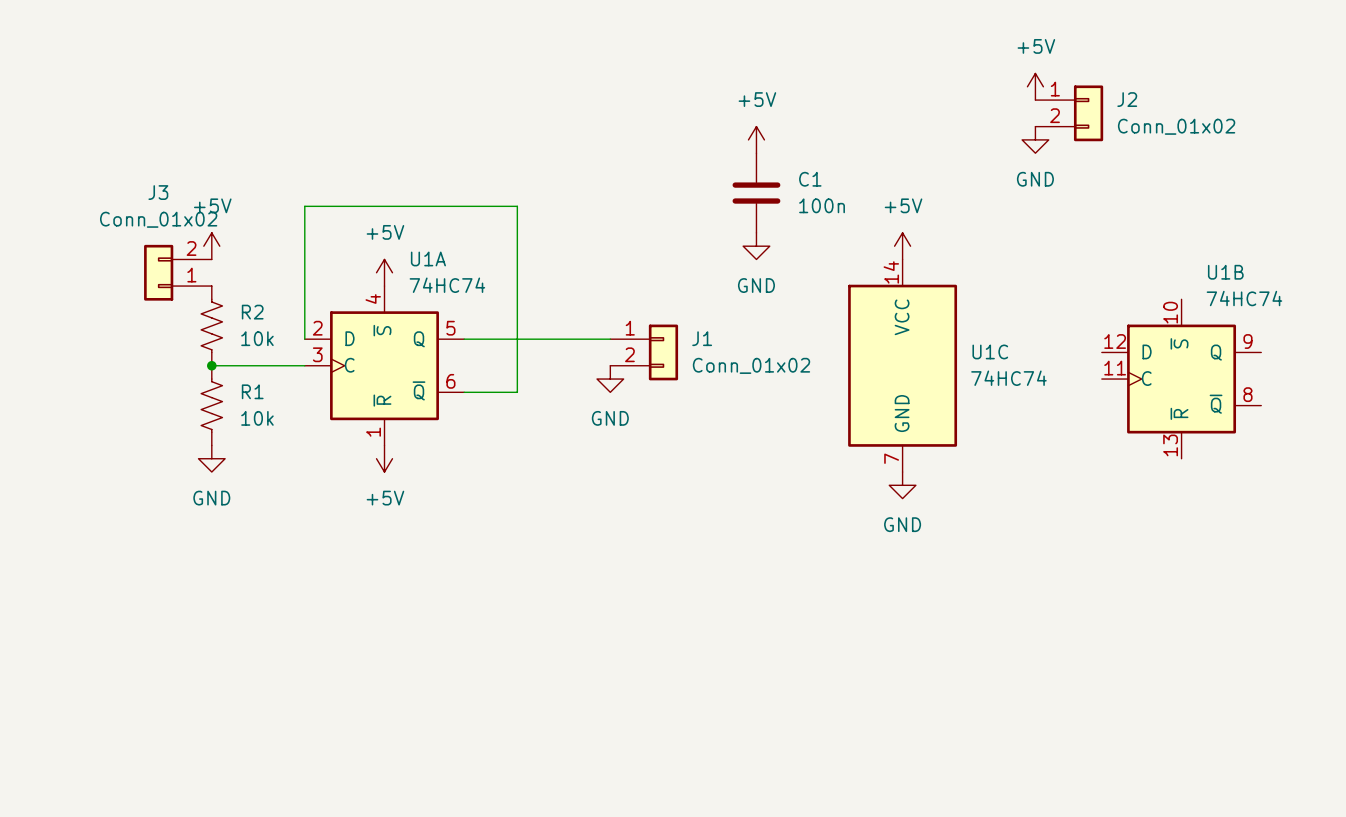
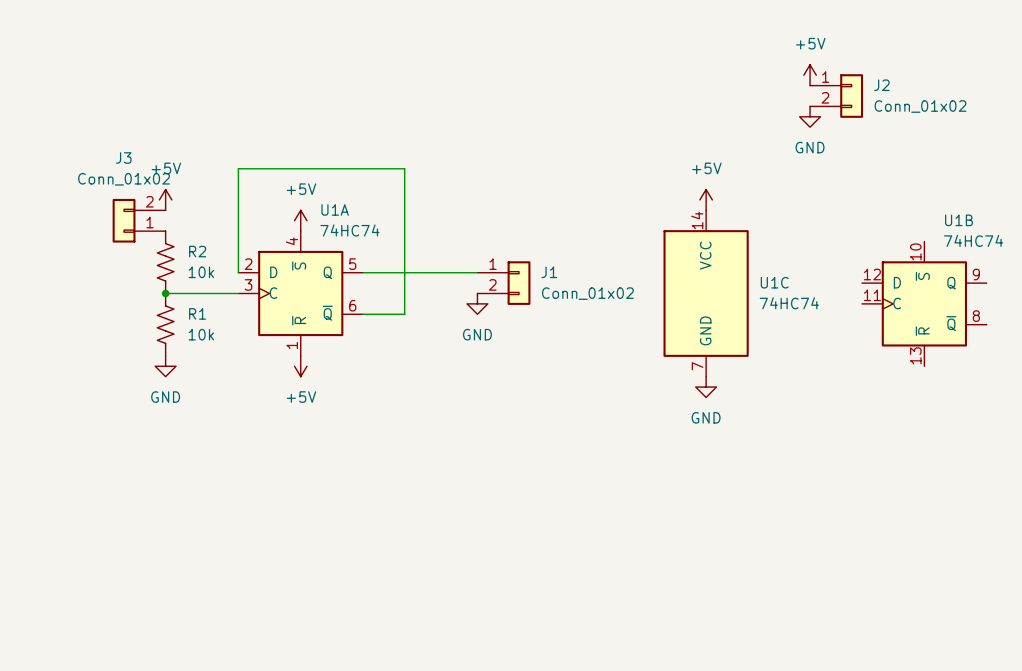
power symbol: +5V (756, 139) -> none
C1: 100n (756, 193) -> none
power symbol: GND (756, 246) -> none

